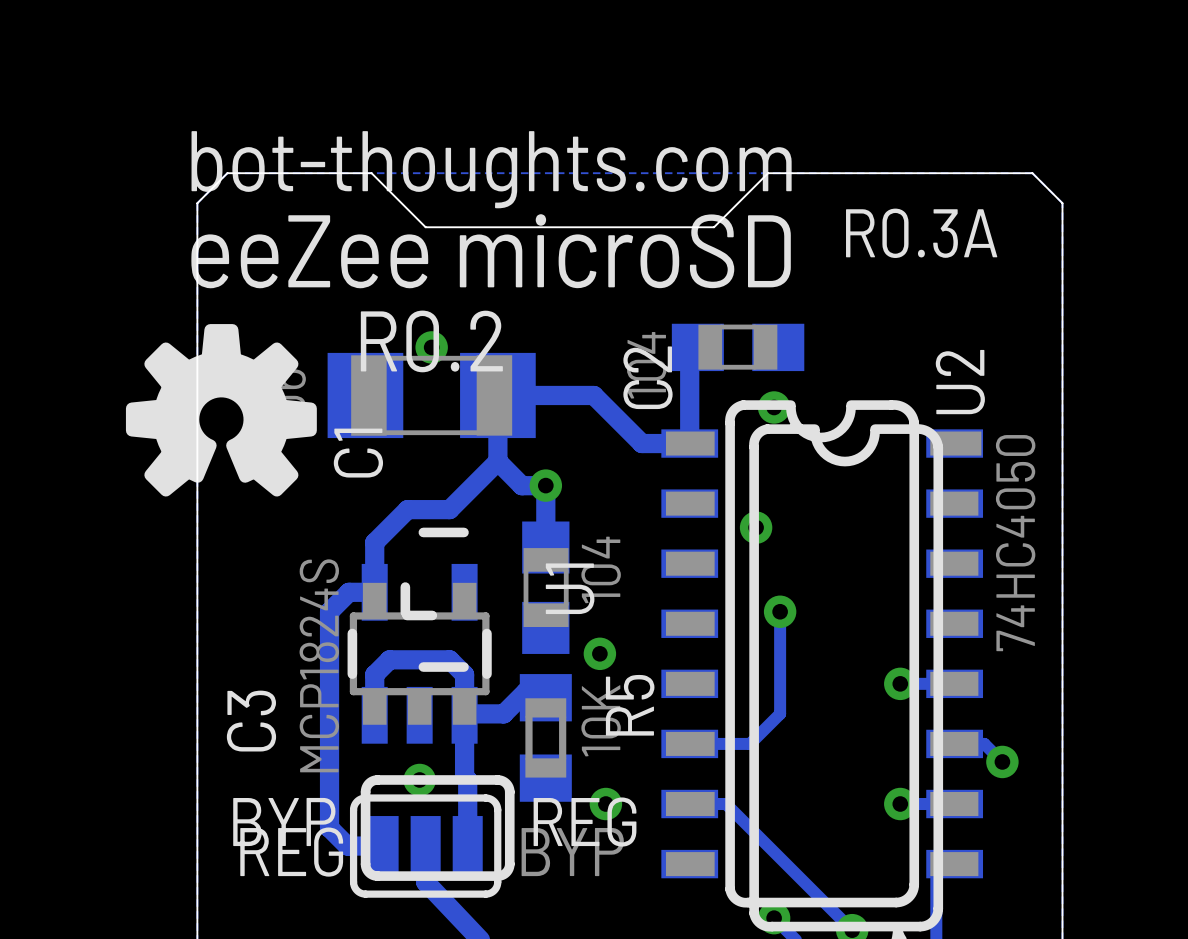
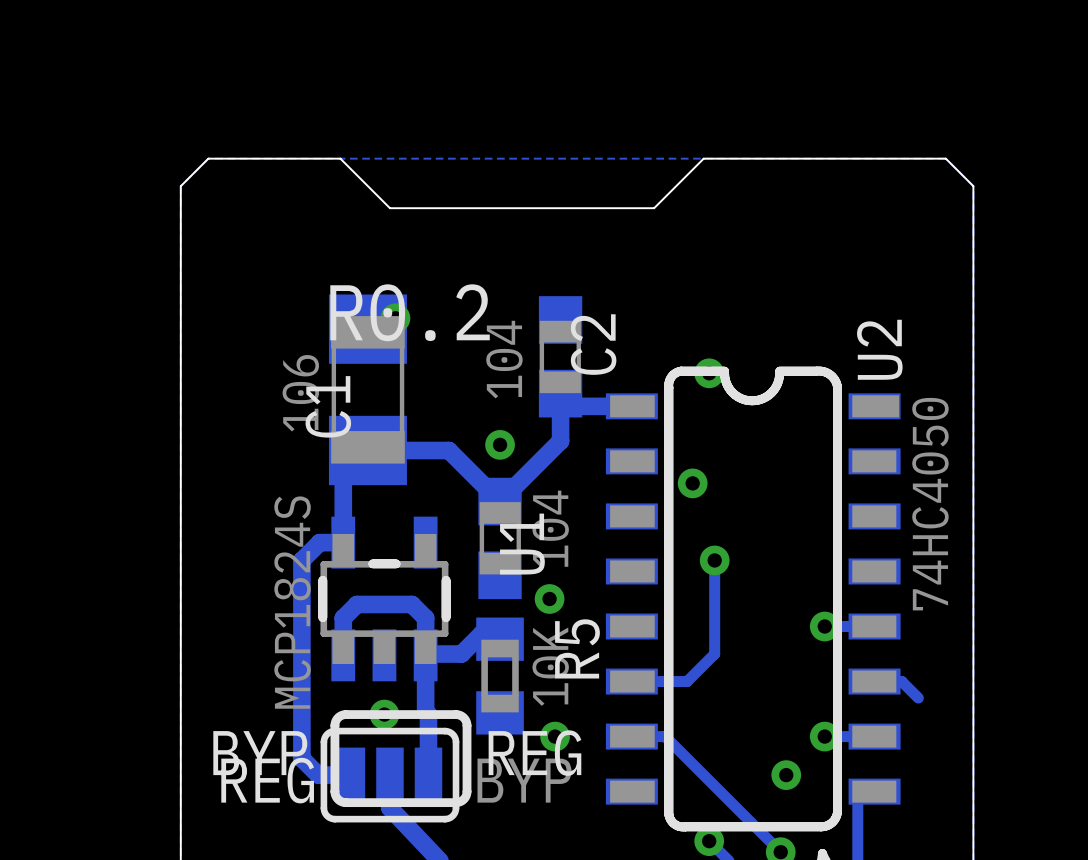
text: bot-thoughts.com (491, 169) -> none
text: R0.3A (921, 233) -> none
text: eeZee microSD (491, 251) -> none
drawing: [125, 324, 317, 497] -> none
track: (697, 347) (689, 355) (689, 443) -> none
part rotation: 0° (738, 347) -> 90° clockwise (560, 356)
part position: (738, 347) -> (560, 356)
part rotation: 0° (431, 395) -> 90° clockwise (367, 389)
line: (914, 429) (875, 429) -> (816, 371) (779, 371)
line: (915, 429) (922, 429) (930, 433) (936, 440) (938, 447) (937, 914) (931, 922) (922, 926) (768, 926) (758, 922) (754, 913) (754, 443) (758, 434) (765, 429) (814, 429) -> (816, 371) (830, 375) (837, 387) (836, 815) (831, 823) (822, 826) (681, 826) (673, 822) (668, 814) (668, 384) (672, 375) (679, 371) (724, 371)
line: (875, 431) (872, 443) (866, 452) (856, 459) (845, 461) (833, 459) (823, 452) (817, 443) (814, 431) -> (779, 373) (777, 383) (771, 392) (762, 398) (752, 400) (741, 398) (732, 392) (726, 383) (724, 373)
track: (641, 443) (593, 395) (497, 395) (497, 461) -> none
track: (497, 461) (449, 509) (407, 509) (374, 542) -> (588, 406) (573, 406) (560, 393) (560, 441) (500, 501) (448, 450) (367, 450) (343, 475) (343, 497)
track: (497, 461) (521, 485) (545, 485) (545, 547) -> none
line: (464, 532) (423, 532) -> none
line: (405, 587) (405, 612) -> none
line: none -> (396, 563) (372, 563)
line: none -> (322, 580) (322, 617)
line: none -> (446, 580) (446, 617)
line: (464, 667) (423, 667) -> none
text: C3 (251, 721) -> none
via position: (1002, 761) -> (786, 775)

